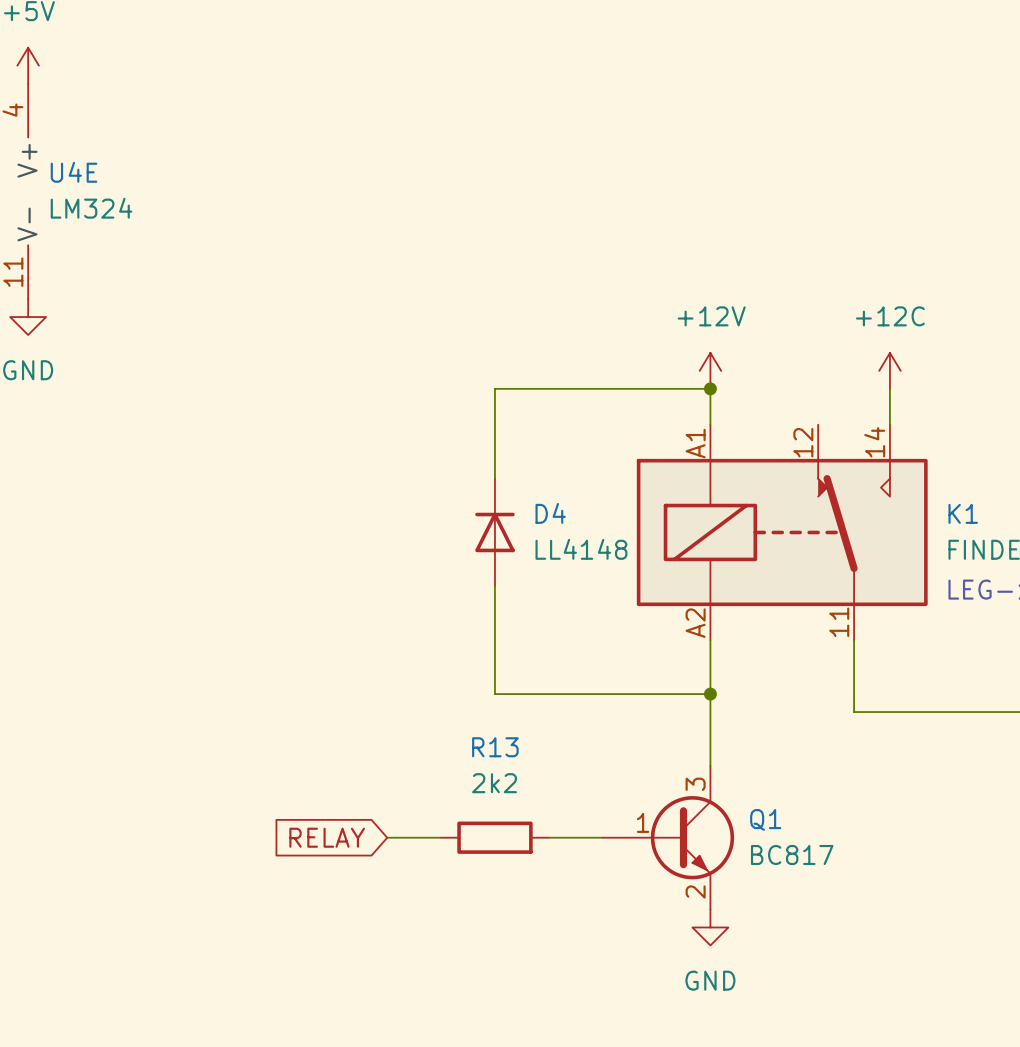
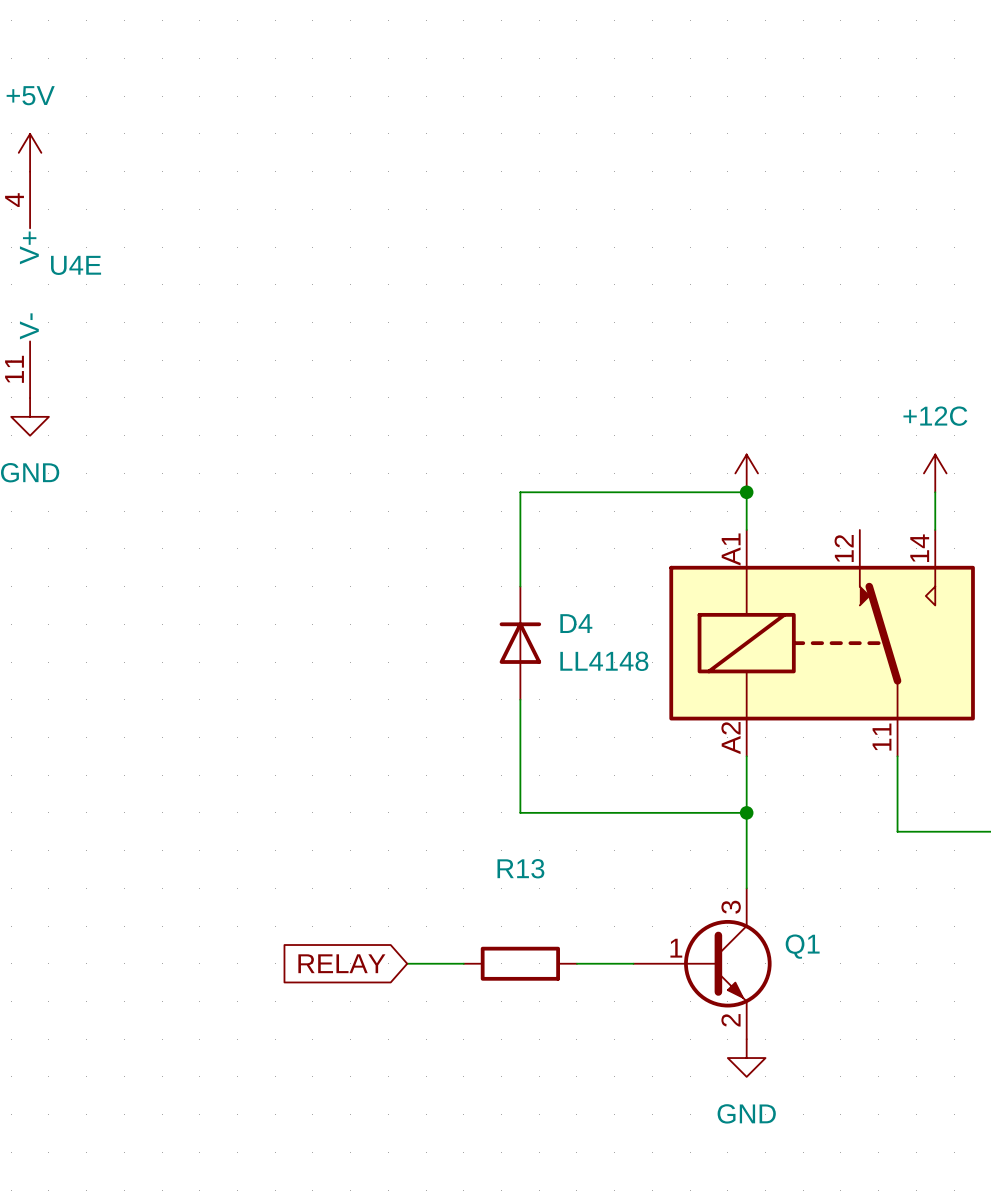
U4E value: LM324 (91, 208) -> none
power symbol text: +12V (711, 316) -> none
R13 value: 2k2 (494, 783) -> none
Q1 value: BC817 (792, 854) -> none

